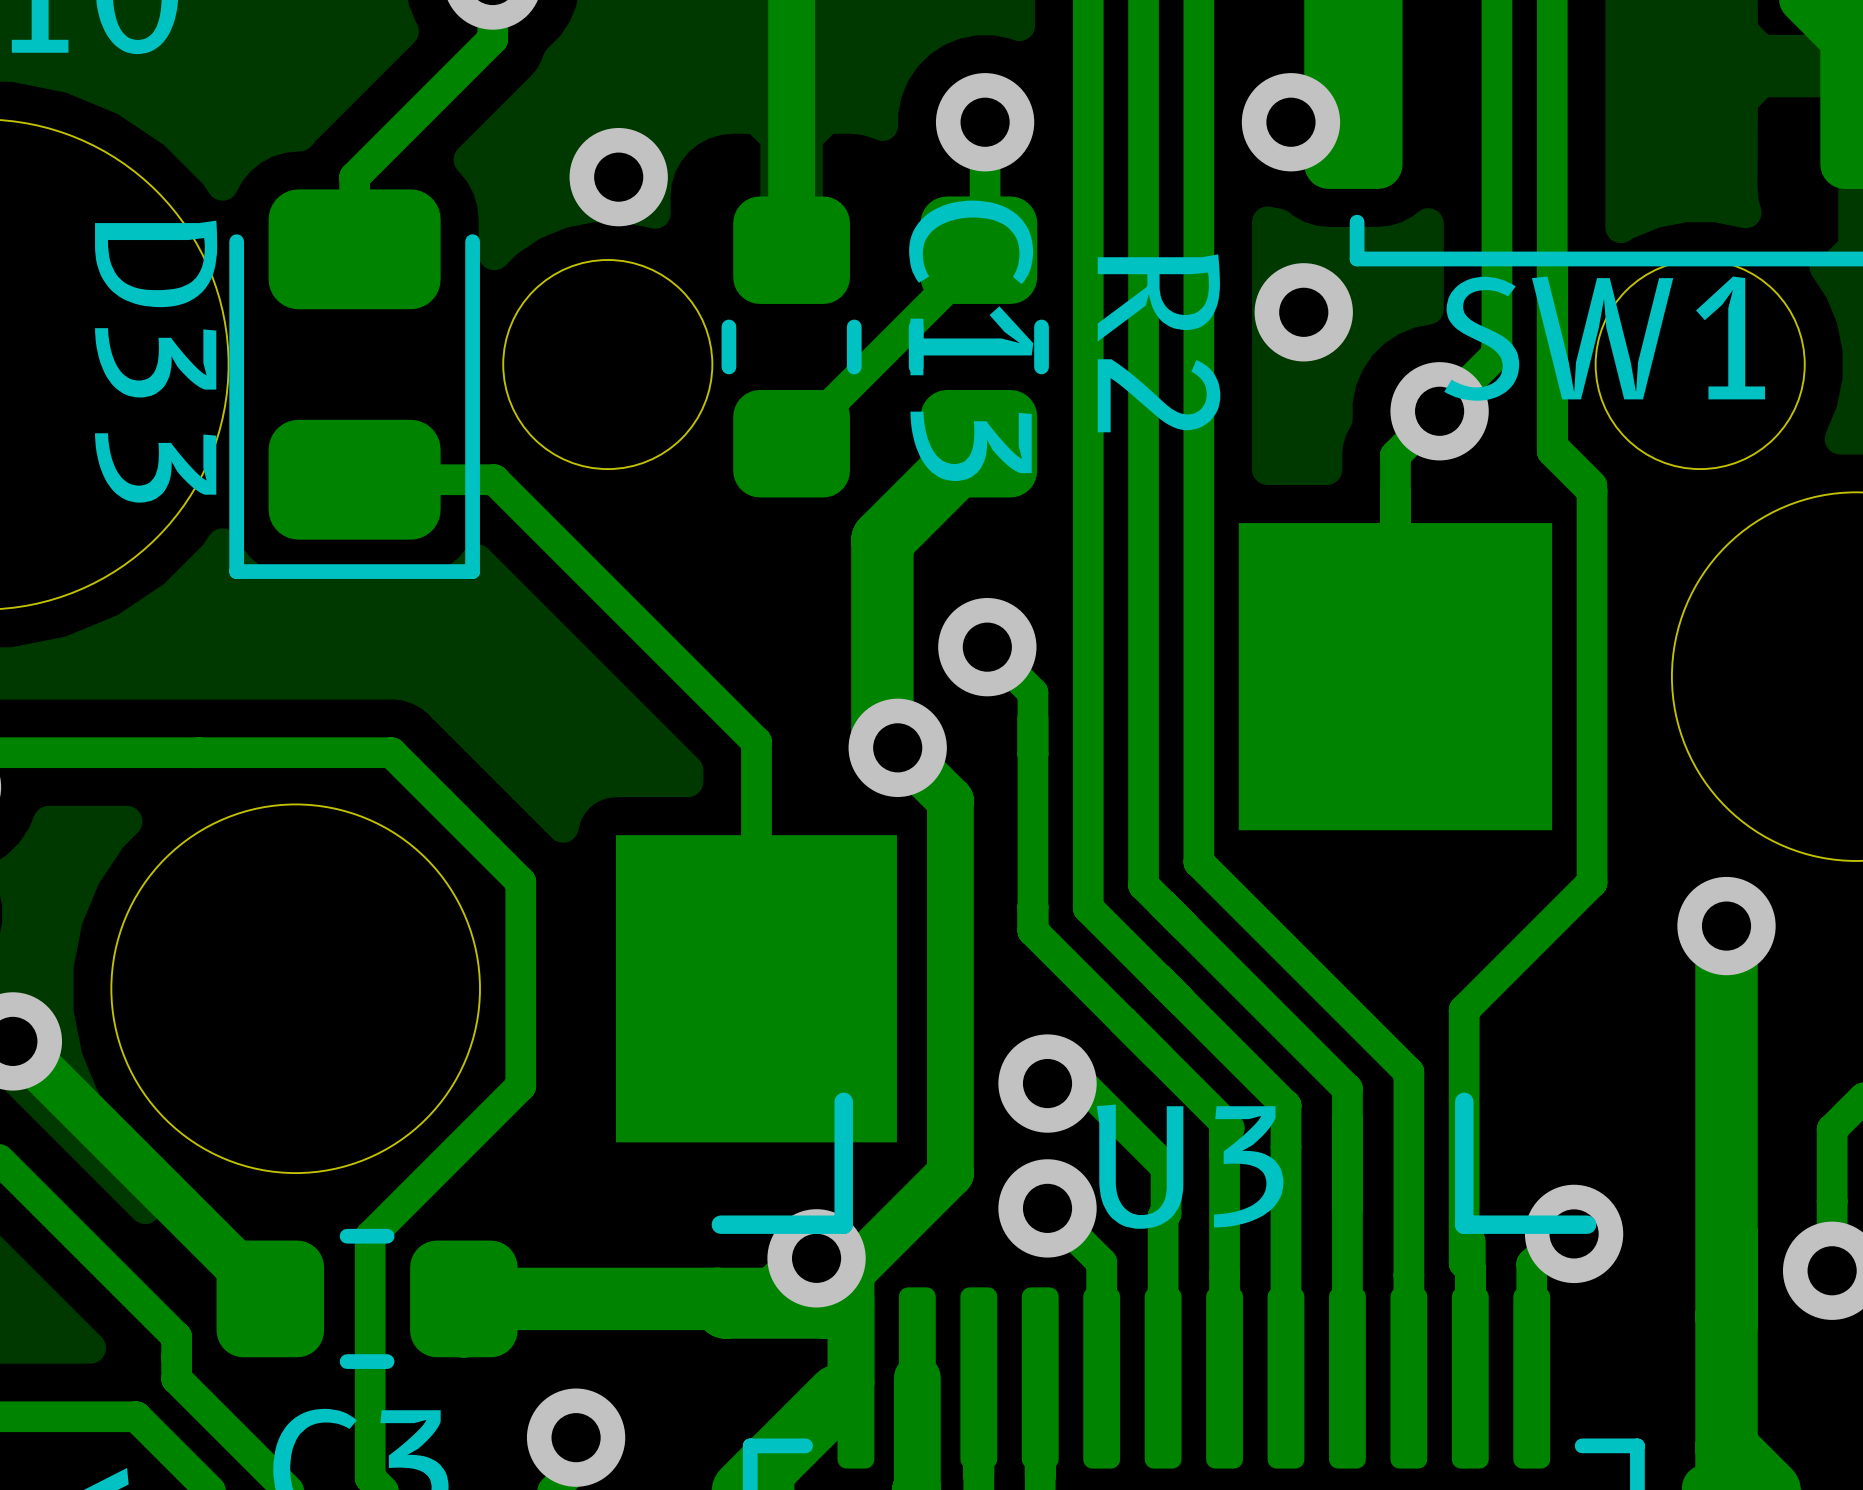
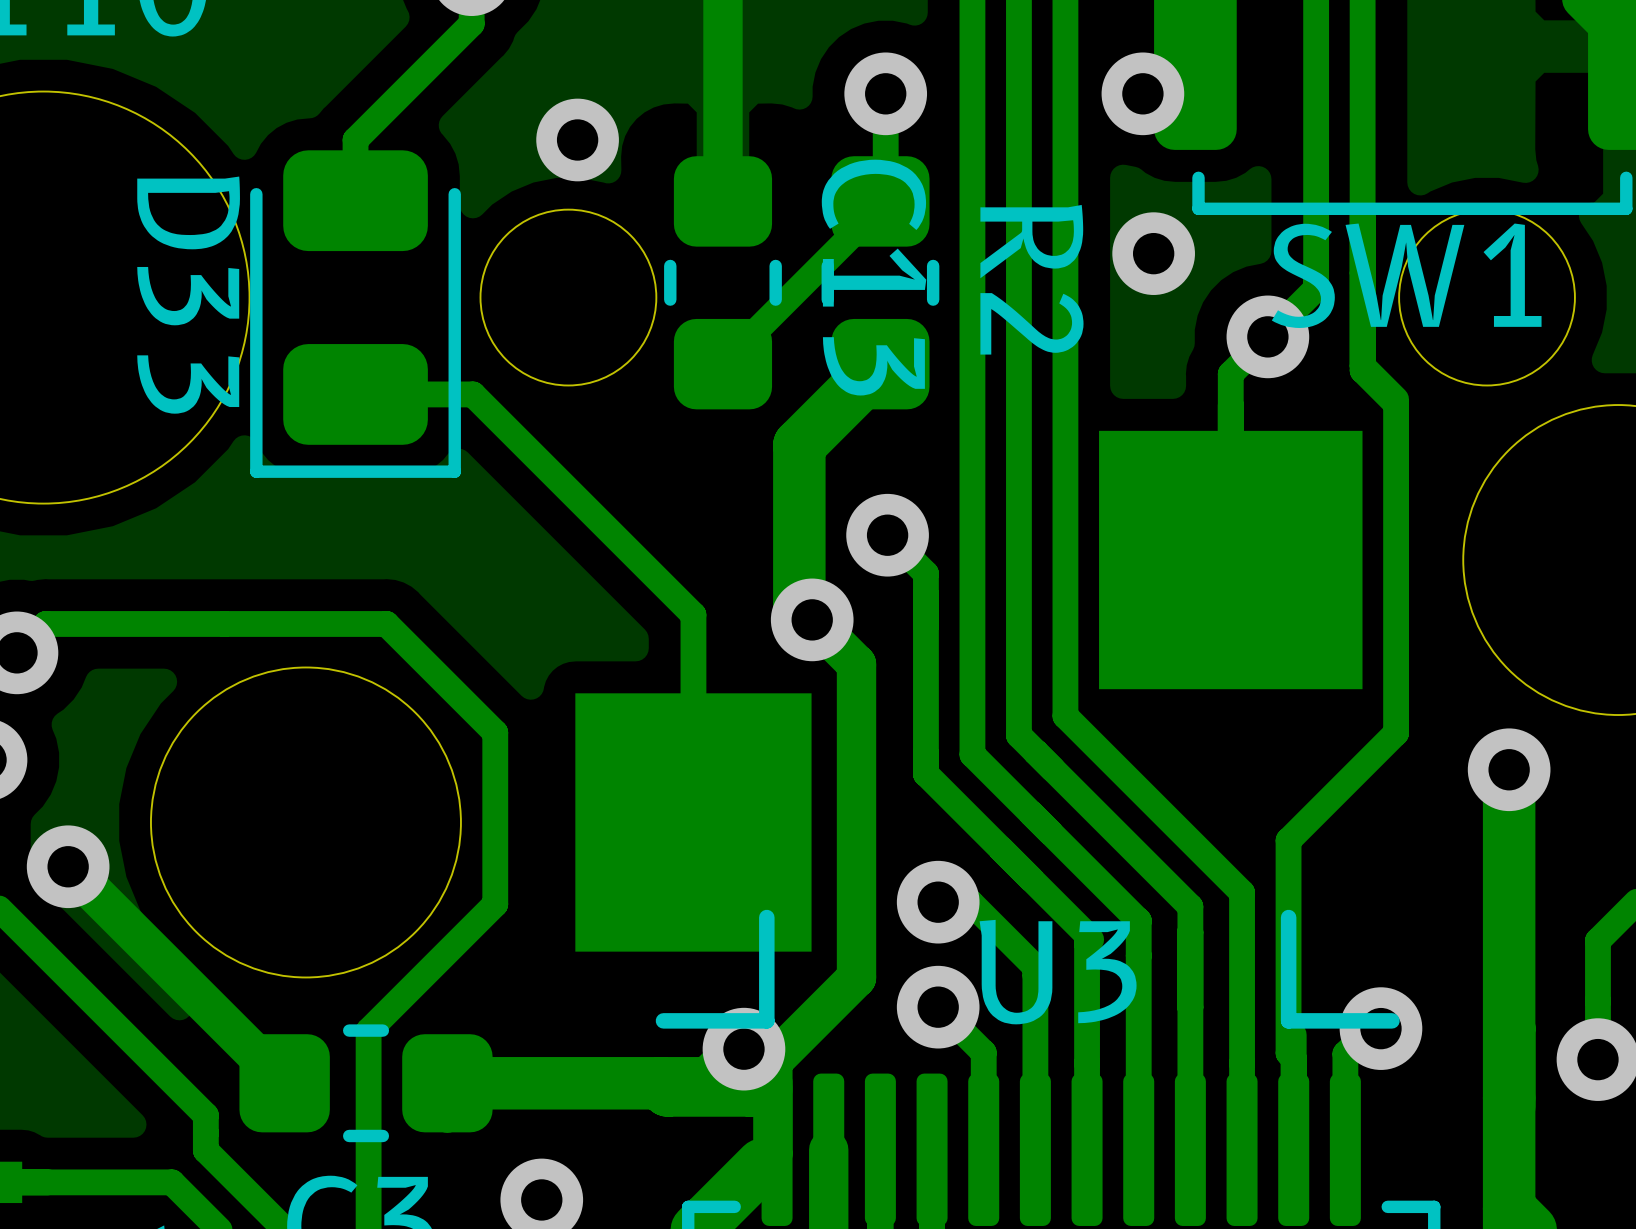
track: (1063, 1064) (1166, 1167) (1166, 1213) (1163, 1216) -> (943, 902) (970, 902) (1035, 967) (1035, 1013)

